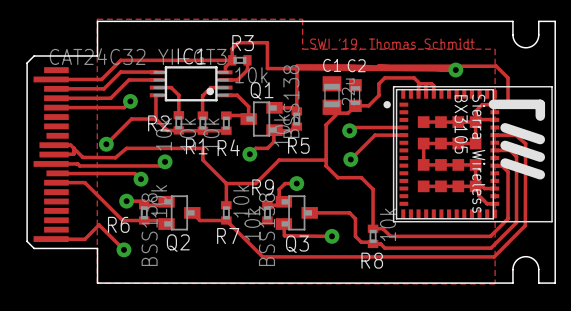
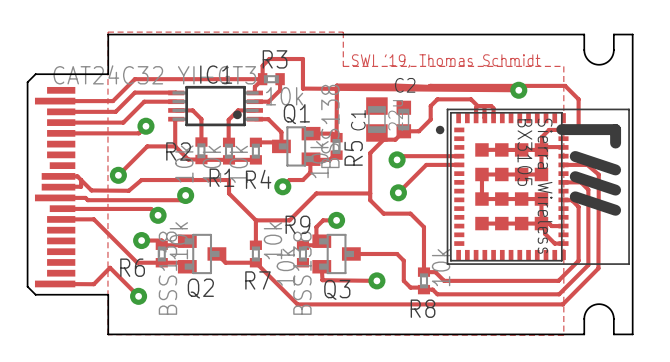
C1 name rotation: 0° (332, 65) -> 90° counterclockwise (358, 120)
C1 name position: C1 (332, 65) -> C1 (358, 120)
R5 name rotation: 0° (298, 145) -> 90° counterclockwise (353, 153)

